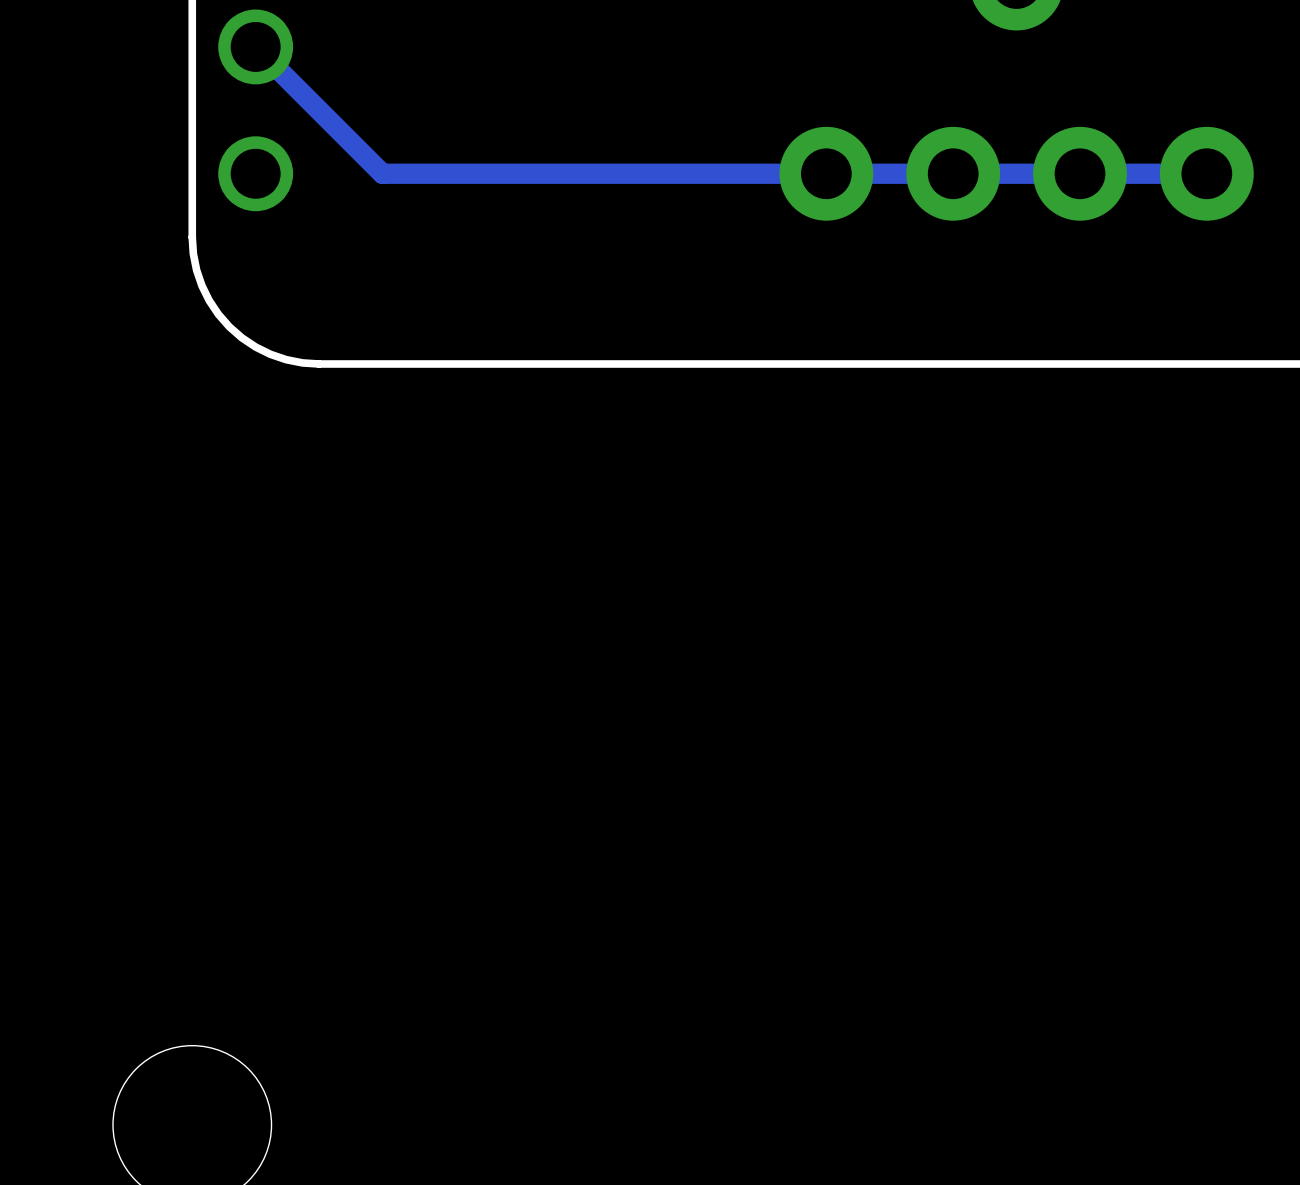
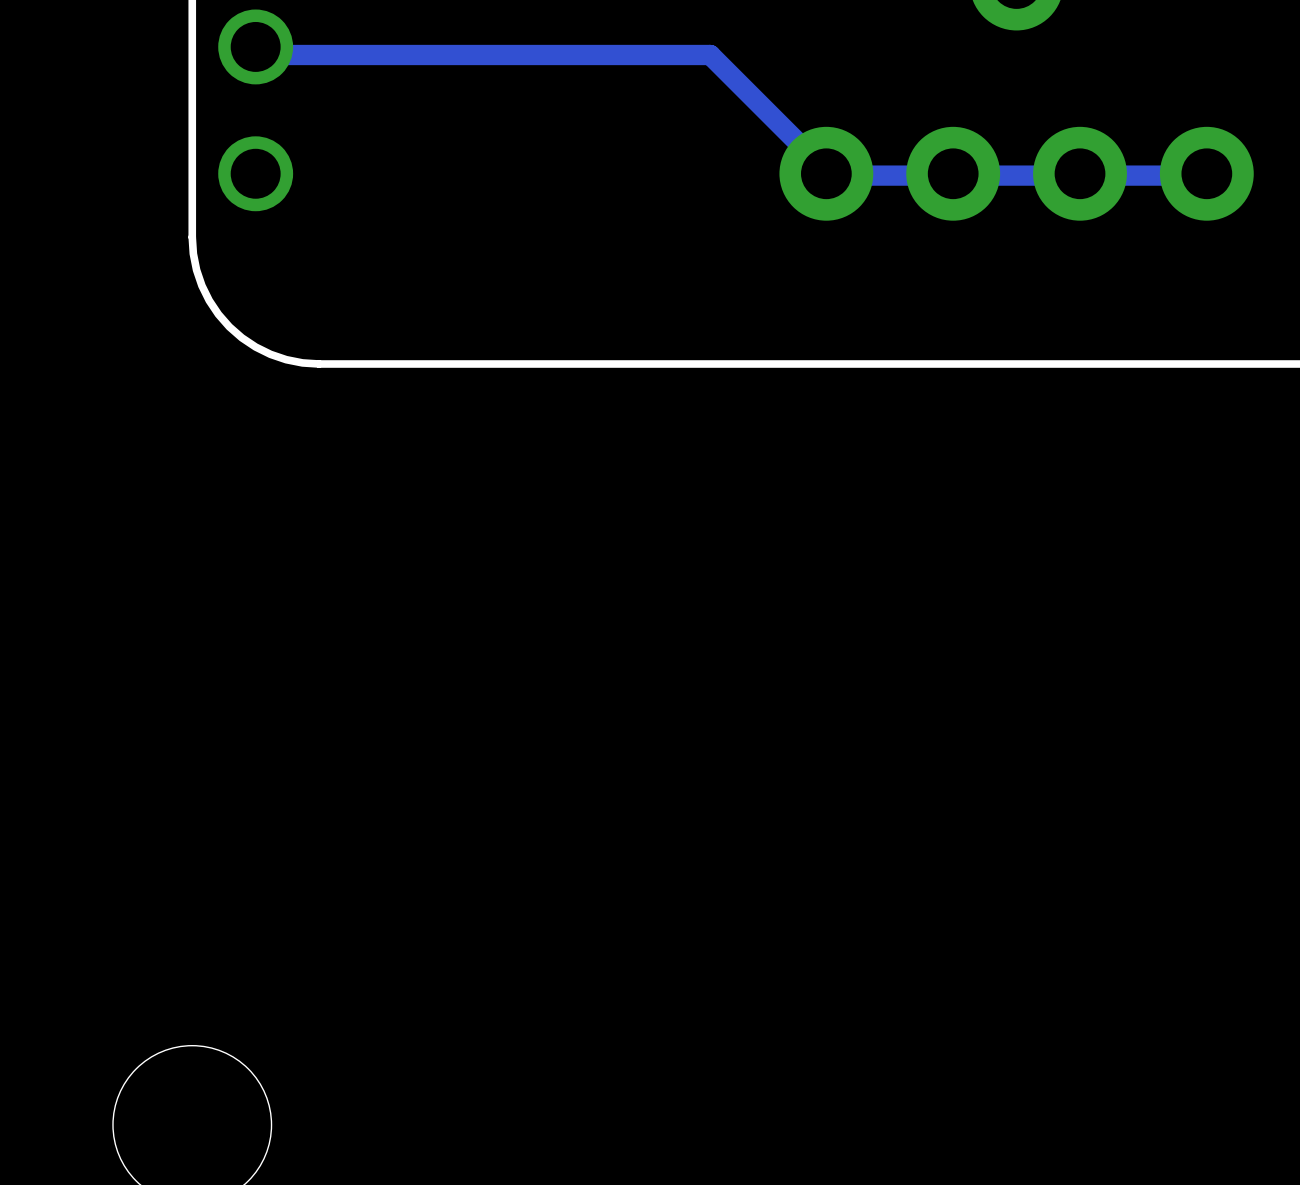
track: (255, 46) (382, 173) (1206, 173) -> (255, 46) (268, 55) (710, 55) (810, 155) (826, 173) (830, 175) (951, 175) (953, 173) (971, 175) (1072, 175) (1080, 173) (1092, 175) (1192, 175) (1206, 173)

